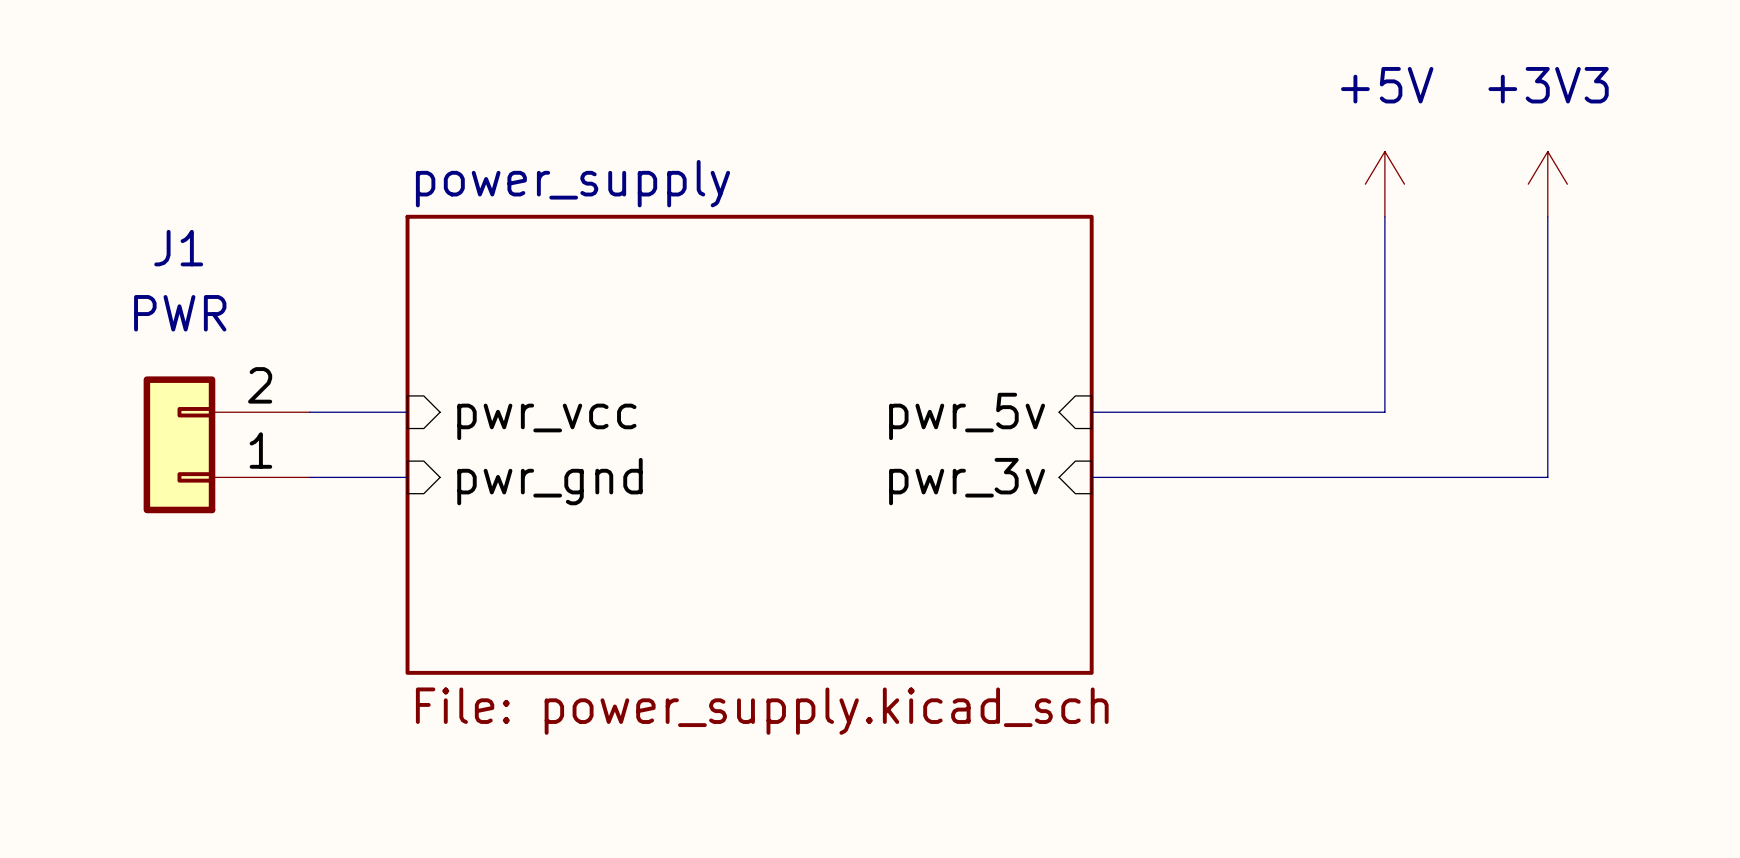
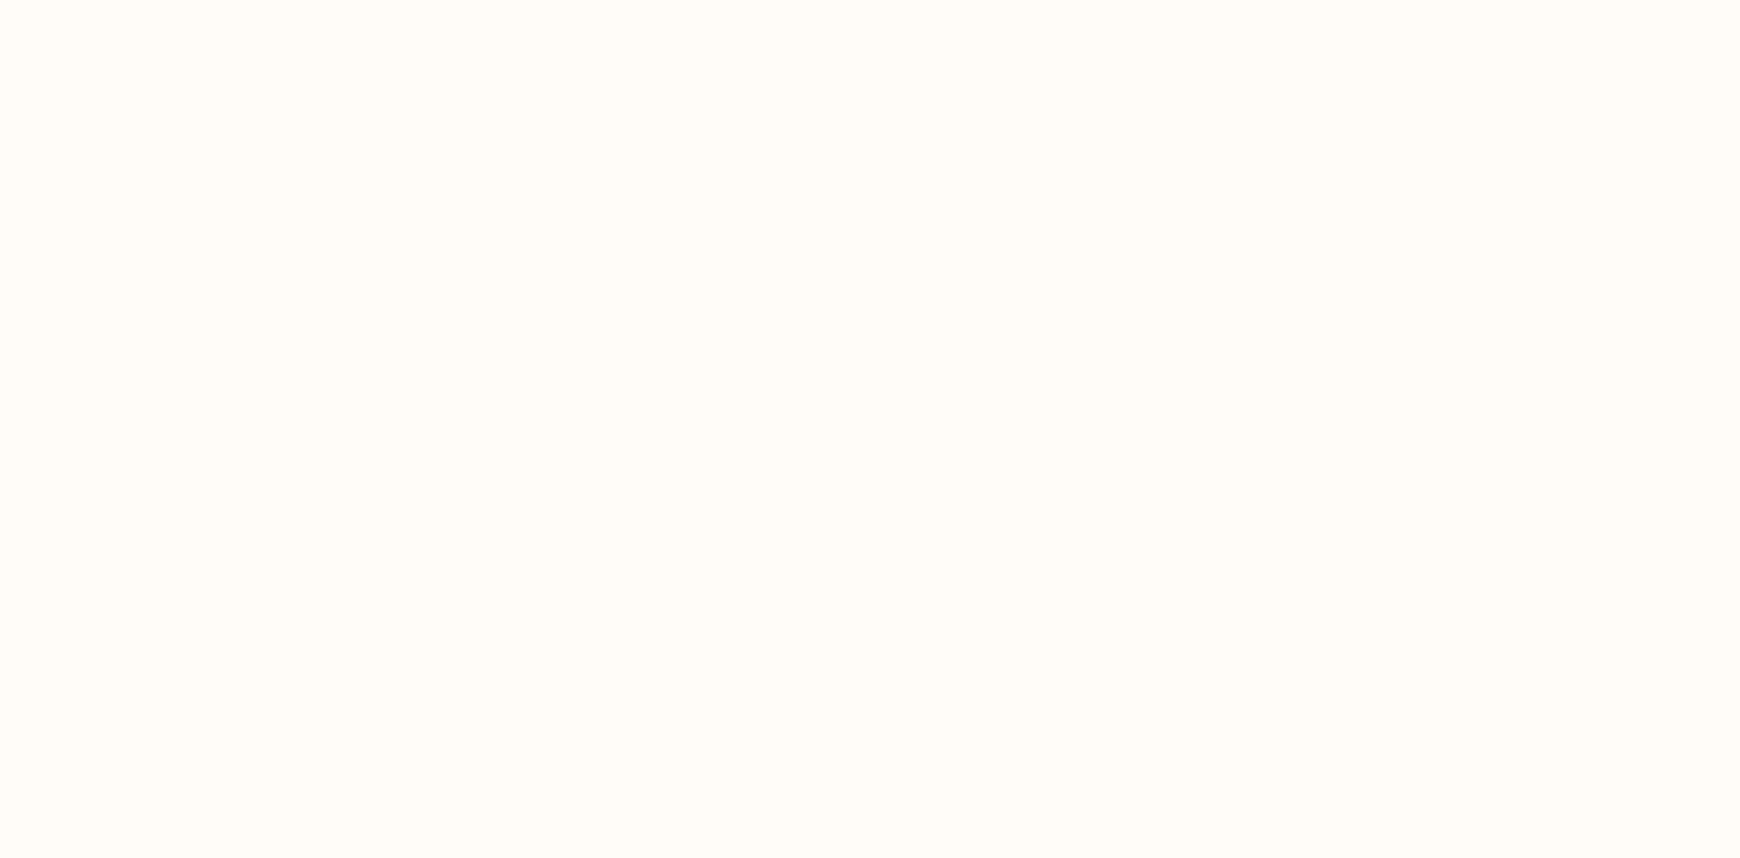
power symbol: +5V (1384, 184) -> none
power symbol: +3V3 (1547, 184) -> none
wire: (1384, 216) (1384, 412) (1091, 412) -> none
wire: (1547, 216) (1547, 477) (1091, 477) -> none
wire: (309, 412) (407, 412) -> none
sheet pin: pwr_5v (967, 416) -> none
sheet pin: pwr_vcc (546, 421) -> none
J1: PWR (226, 444) -> none
sheet power_supply: File: power_supply.kicad_sch (749, 444) -> none
wire: (309, 477) (407, 477) -> none
sheet pin: pwr_gnd (549, 481) -> none
sheet pin: pwr_3v (967, 481) -> none

